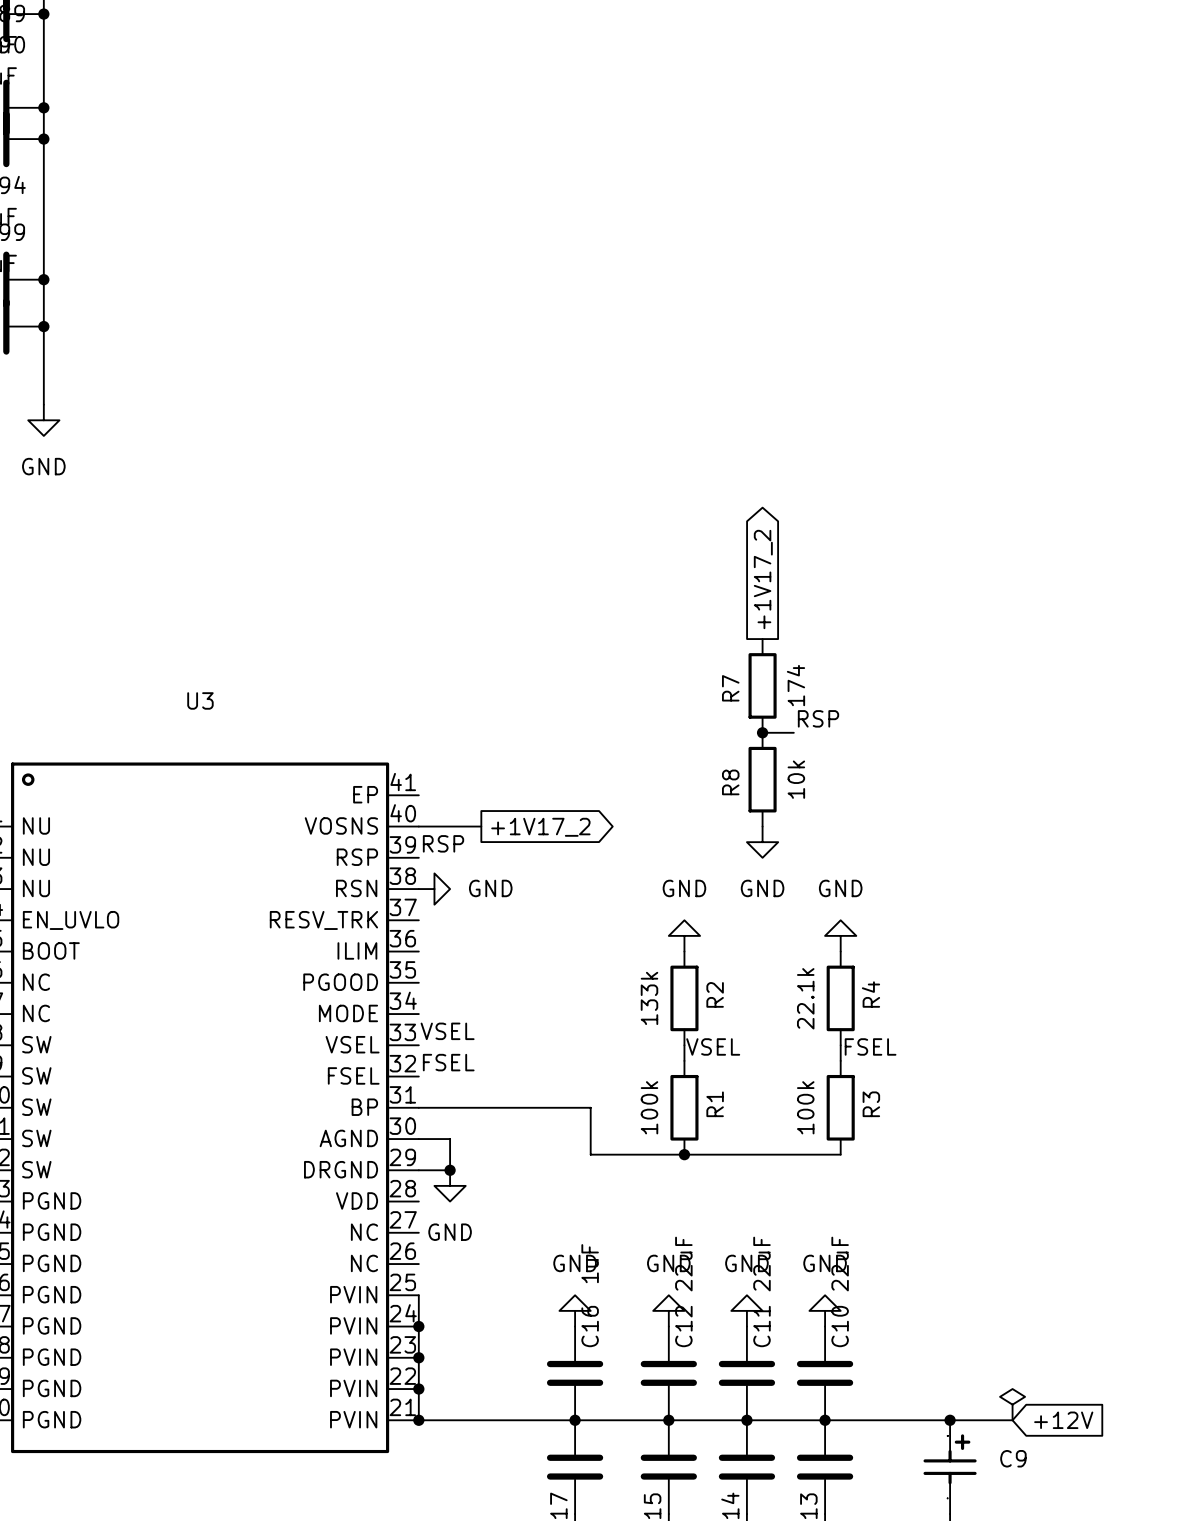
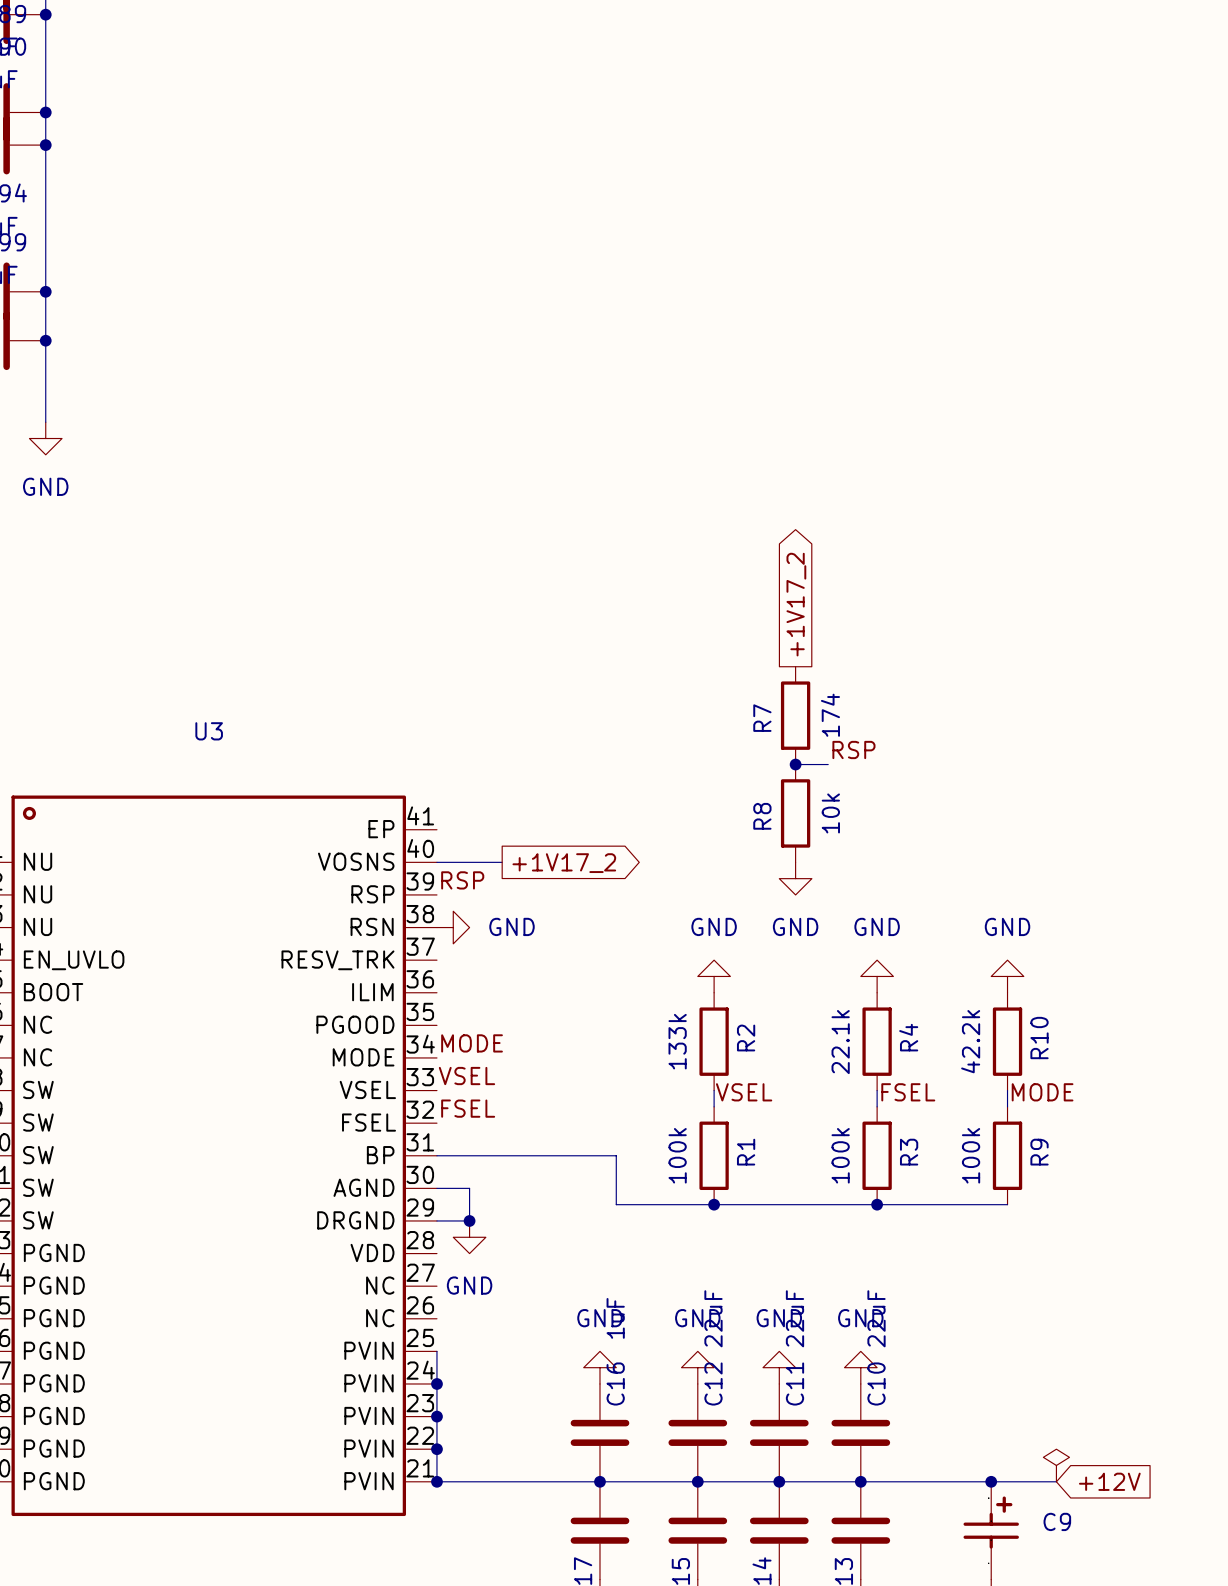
power symbol: none -> GND (1007, 976)
R10: none -> 42.2k (1007, 1041)
label: none -> MODE (472, 1043)
wire: none -> (1007, 1090) (1007, 1106)
label: none -> MODE (1042, 1092)
R9: none -> 100k (1007, 1155)
wire: none -> (877, 1204) (1007, 1204)
junction: none -> (877, 1204)

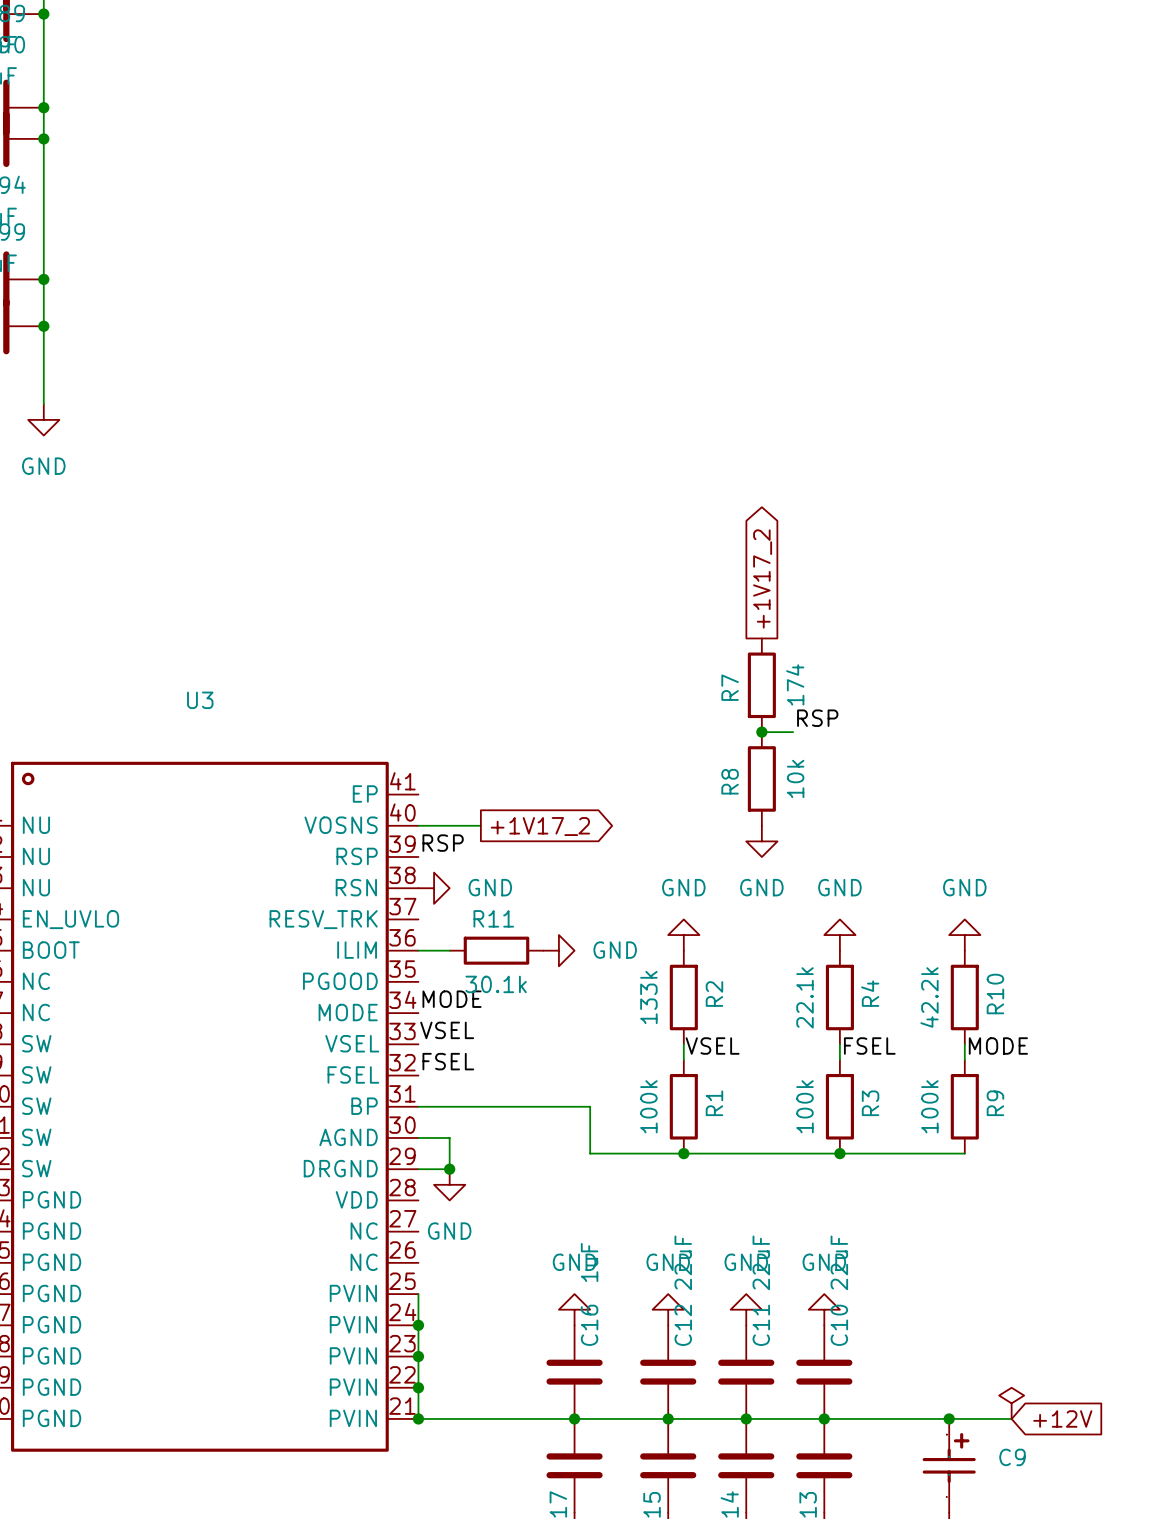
wire: none -> (418, 950) (449, 950)
R11: none -> 30.1k (496, 950)
power symbol: none -> GND (558, 950)

